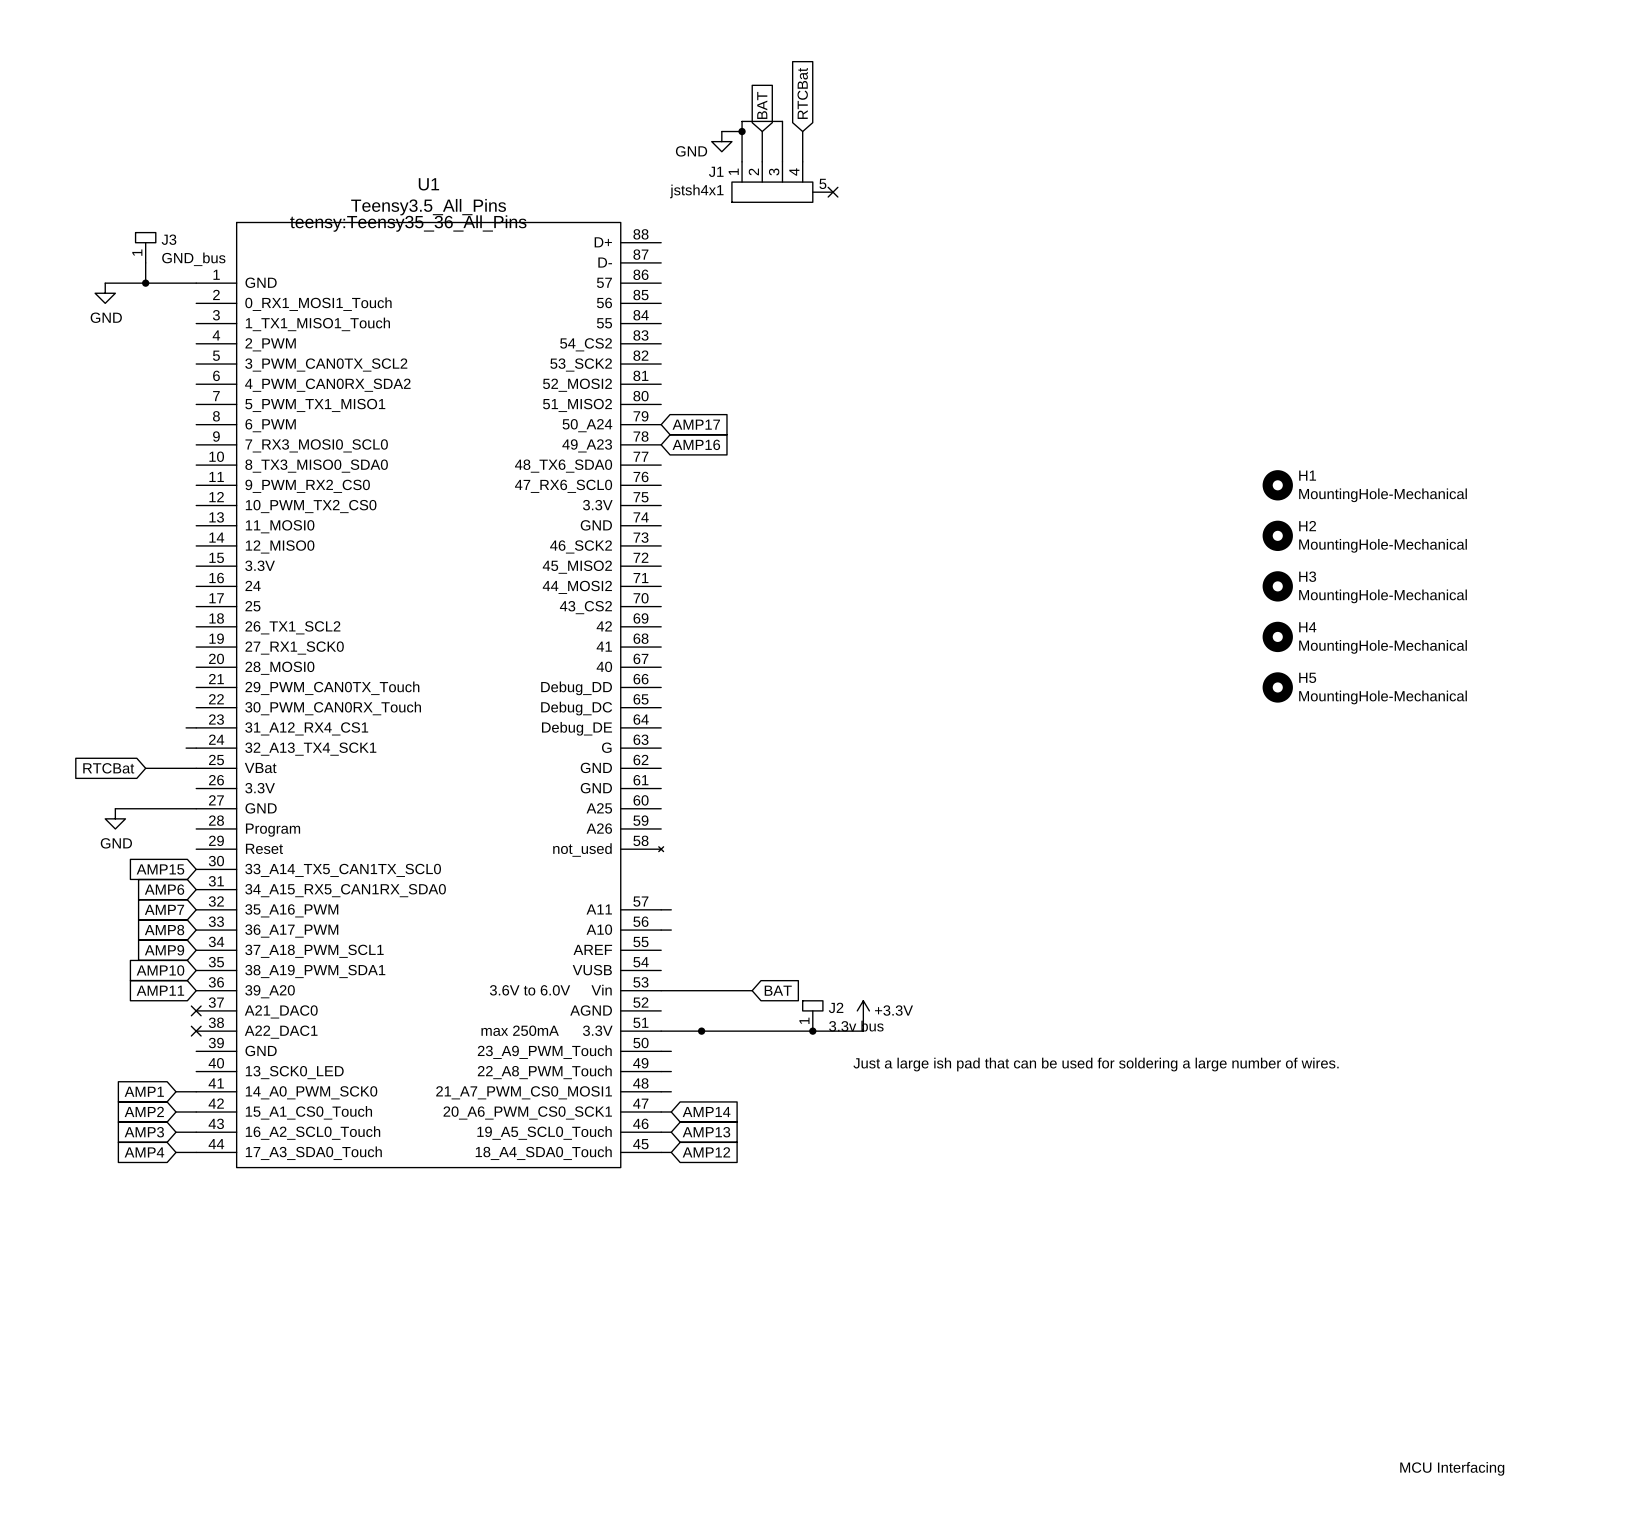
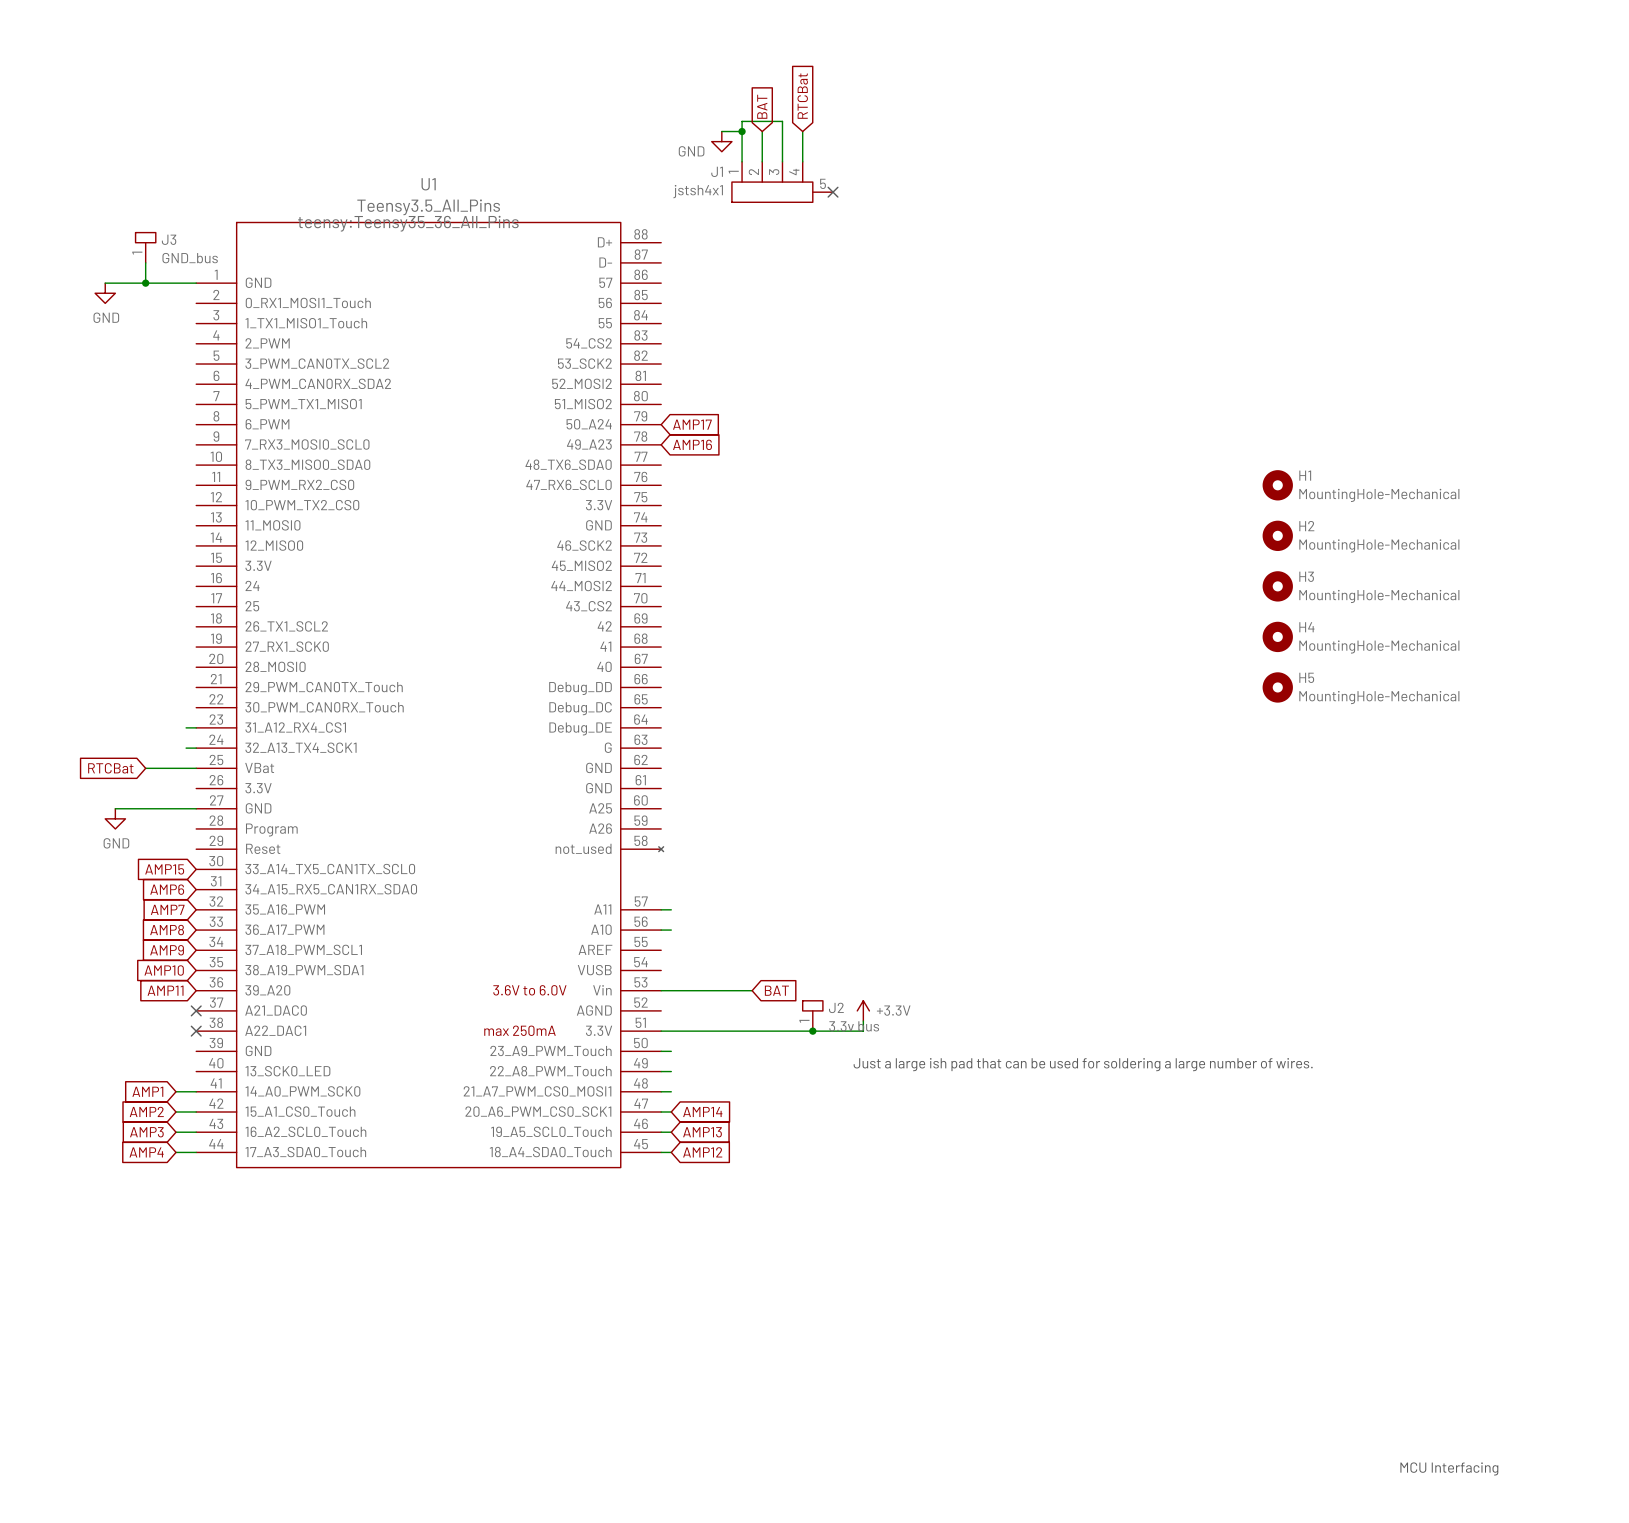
junction: (701, 1031) -> none

